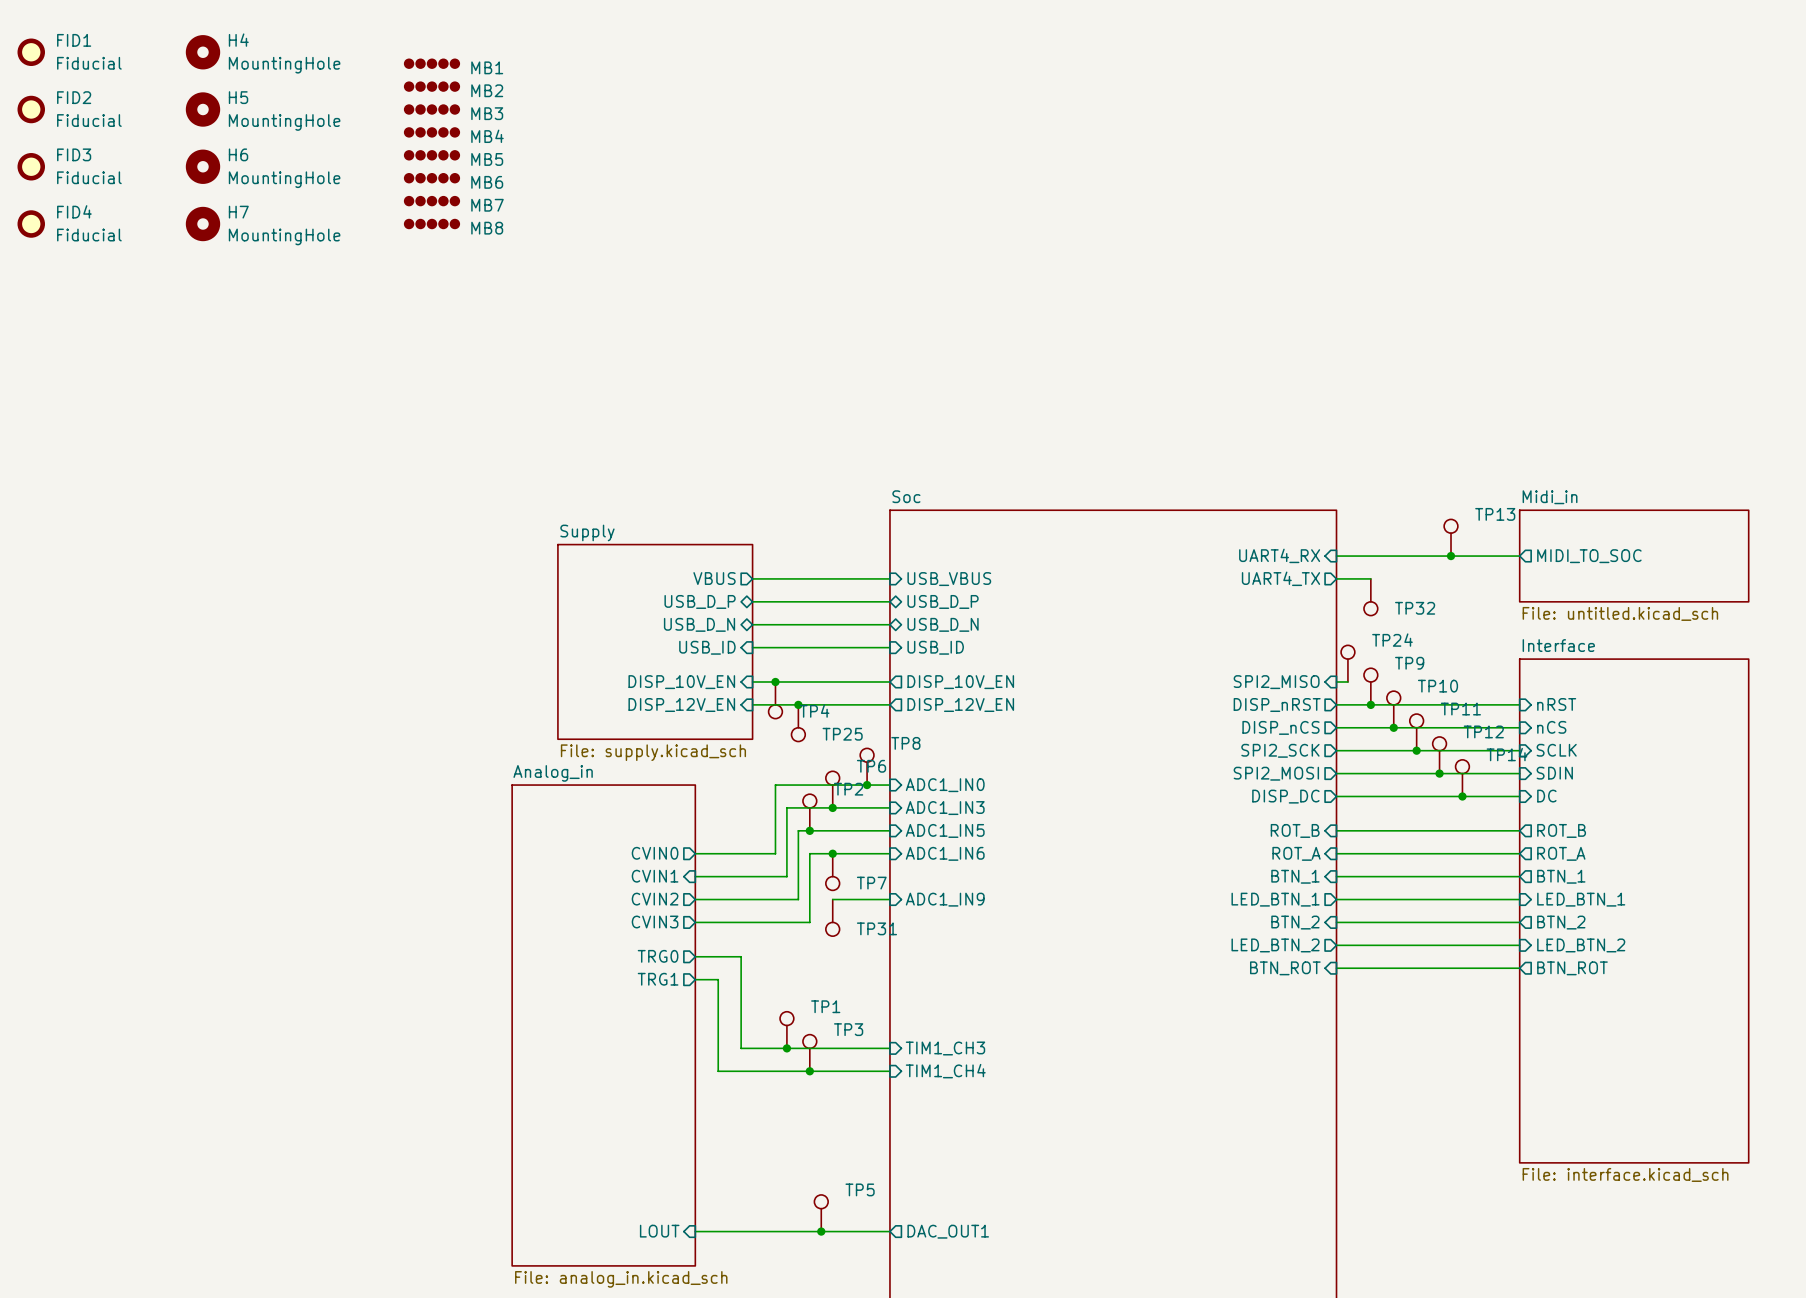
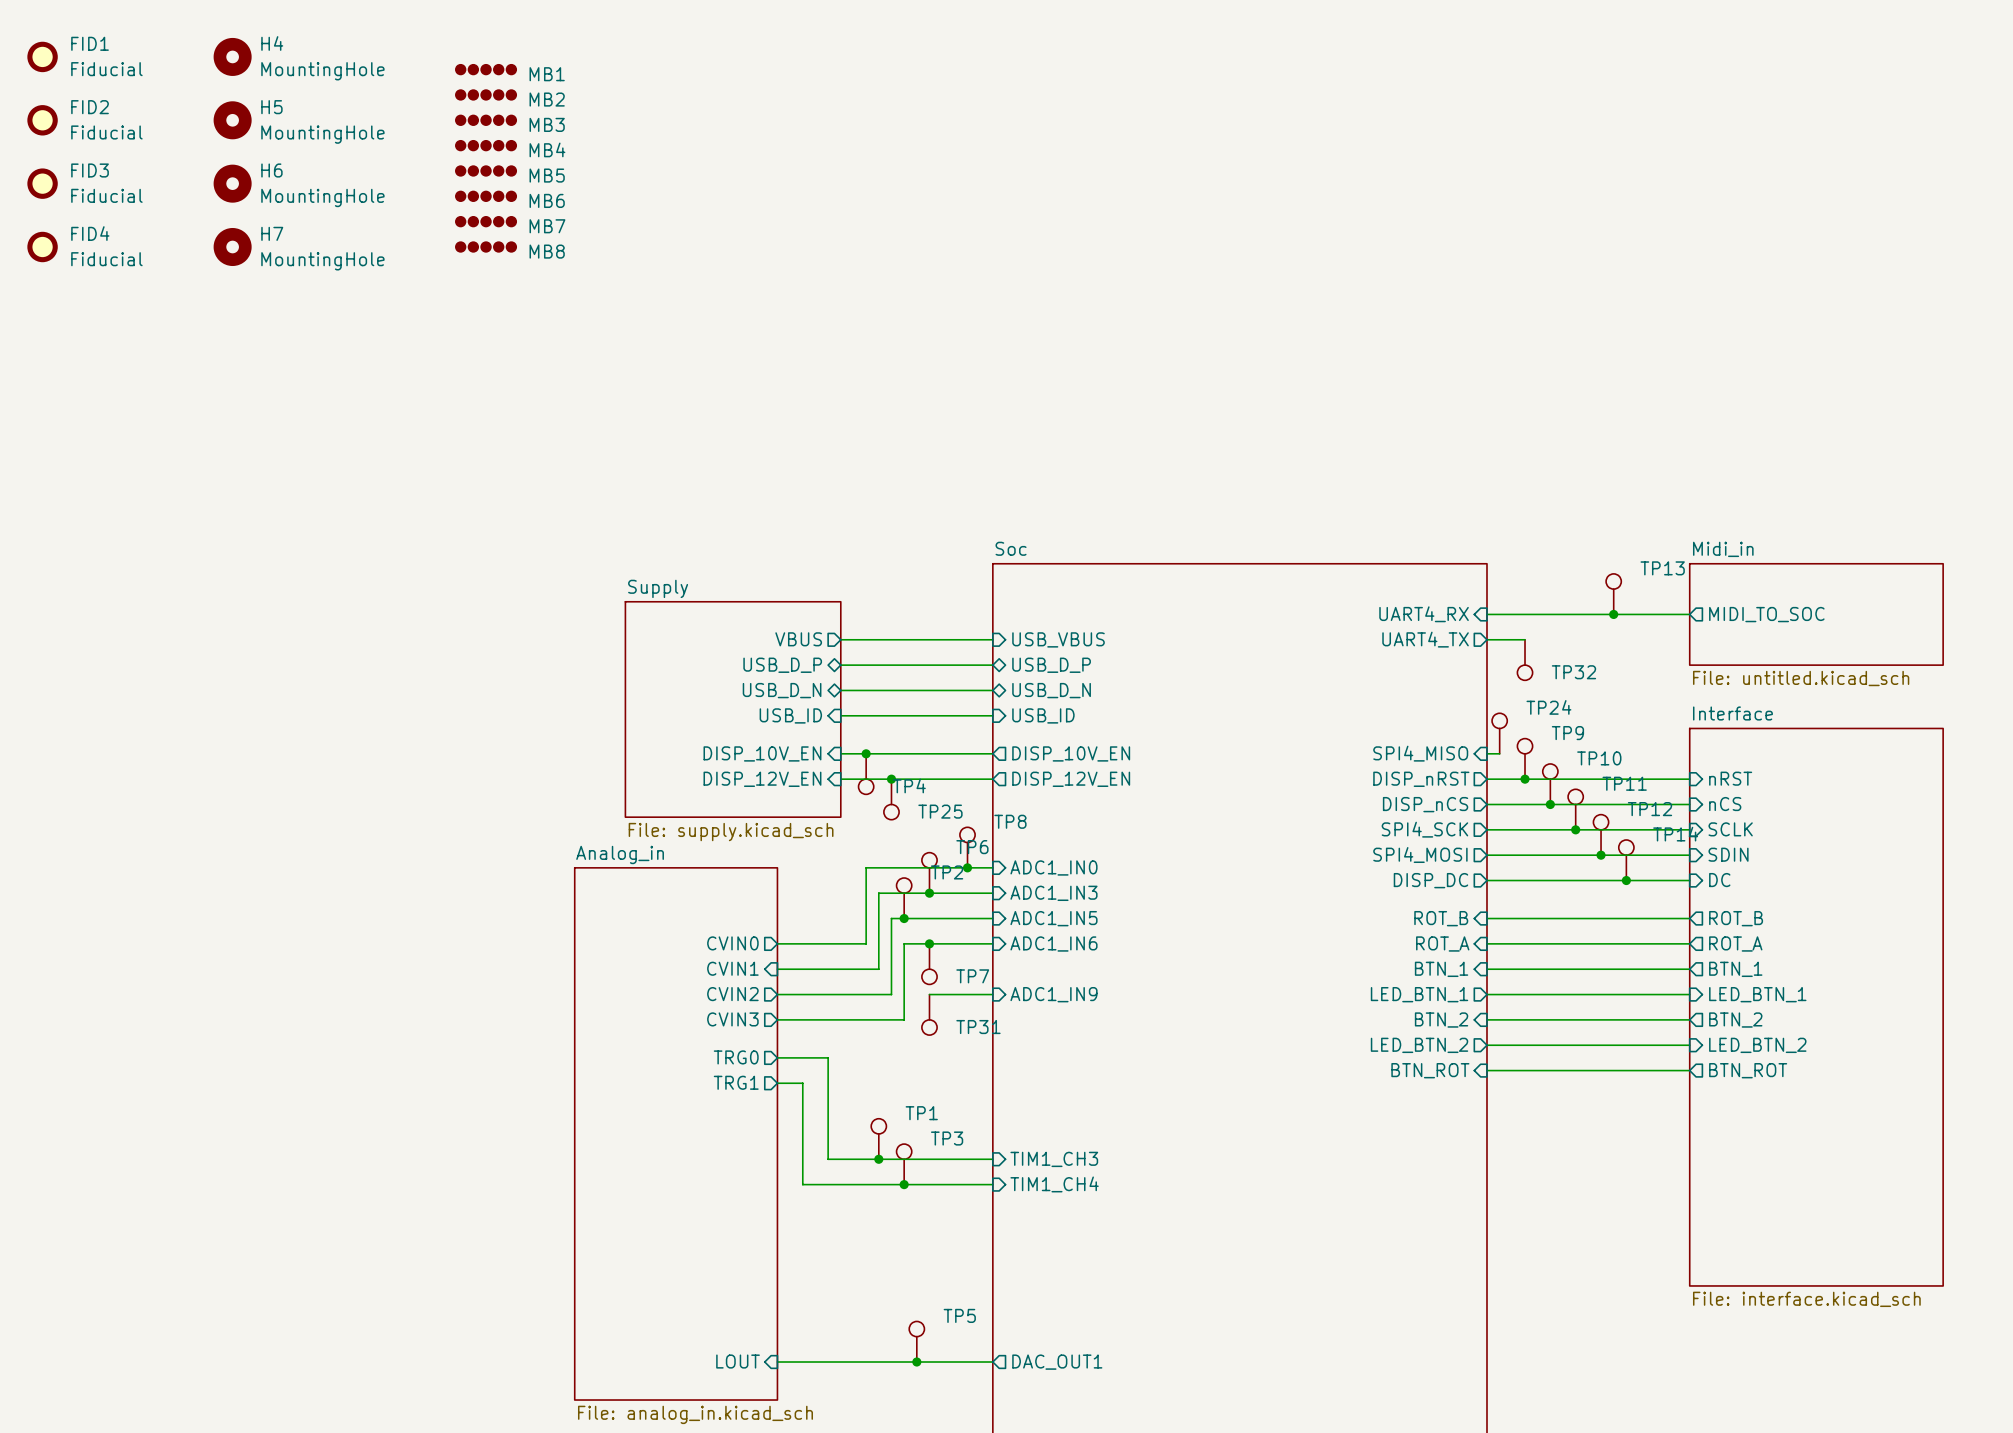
sheet pin: SPI2_MISO (1276, 682) -> SPI4_MISO (1420, 753)
sheet pin: SPI2_SCK (1280, 750) -> SPI4_SCK (1424, 829)
sheet pin: SPI2_MOSI (1276, 773) -> SPI4_MOSI (1420, 855)

